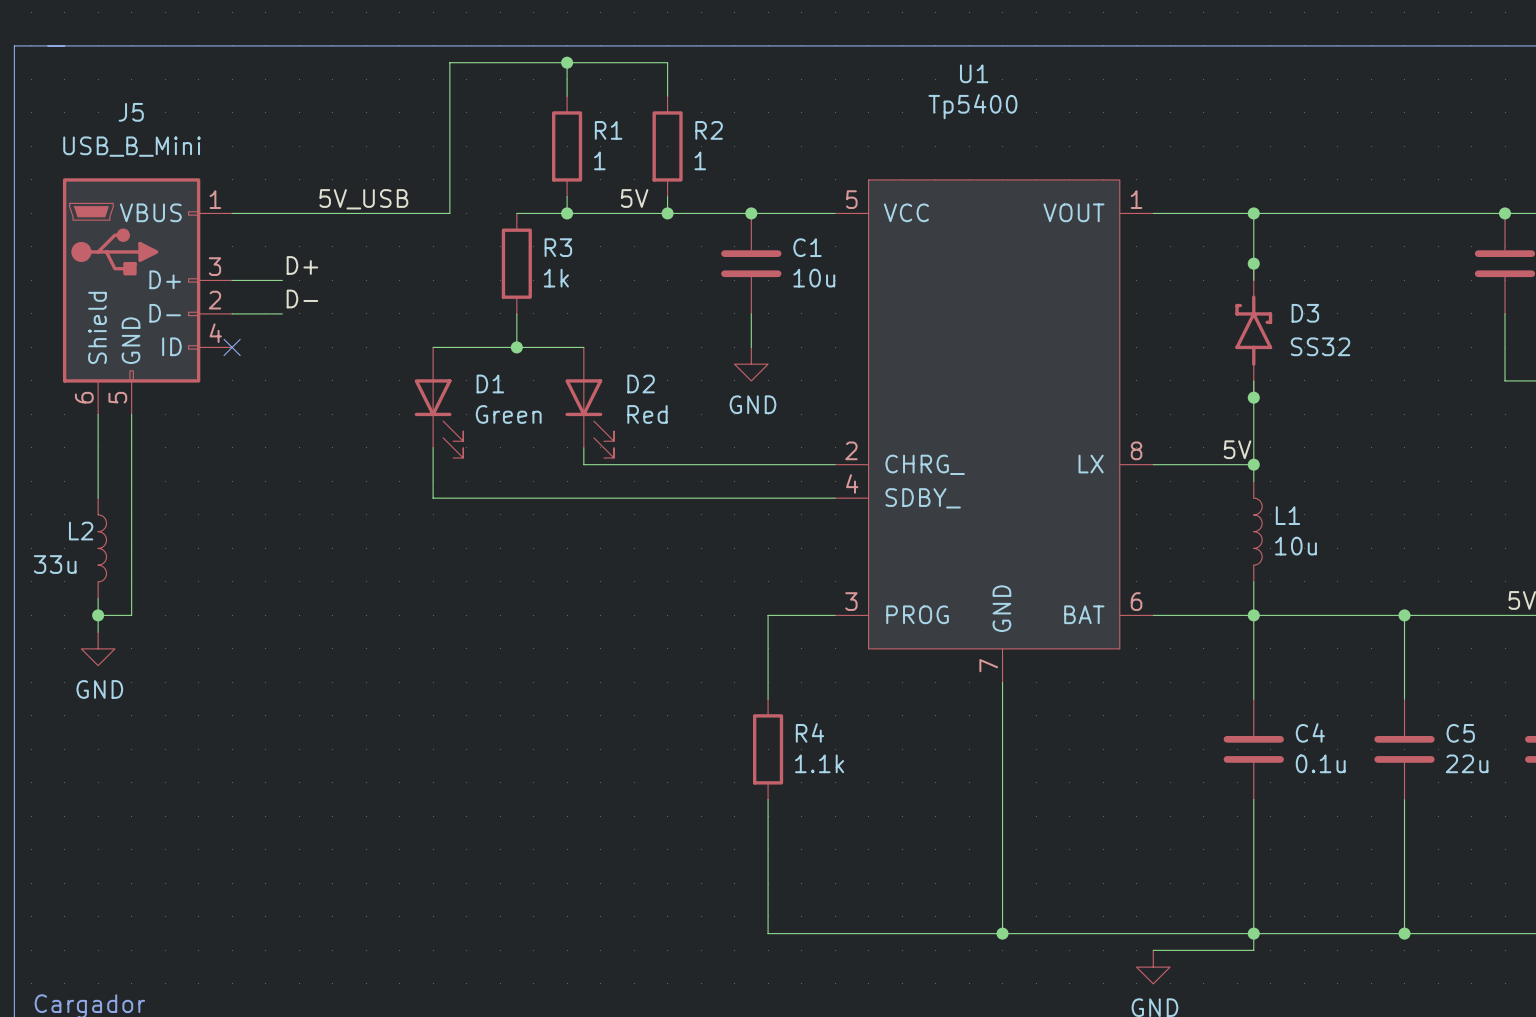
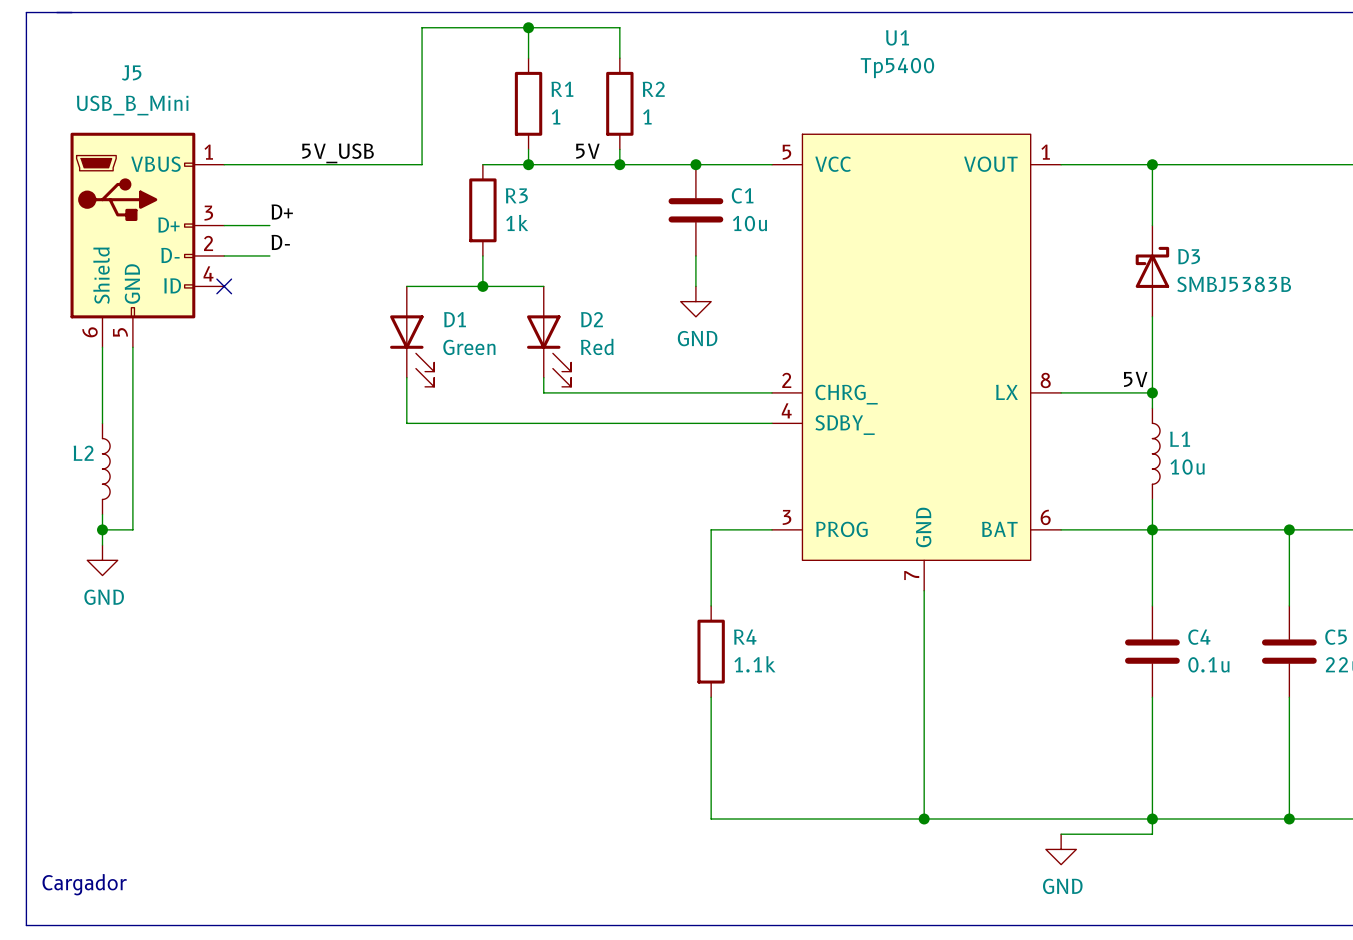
D3 symbol: [1235, 263, 1273, 398] -> [1135, 225, 1170, 317]
junction: (1253, 263) -> none
D3 value: SS32 (1320, 346) -> SMBJ5383B (1234, 284)
junction: (1253, 397) -> none
L2 value: 33u (55, 564) -> none

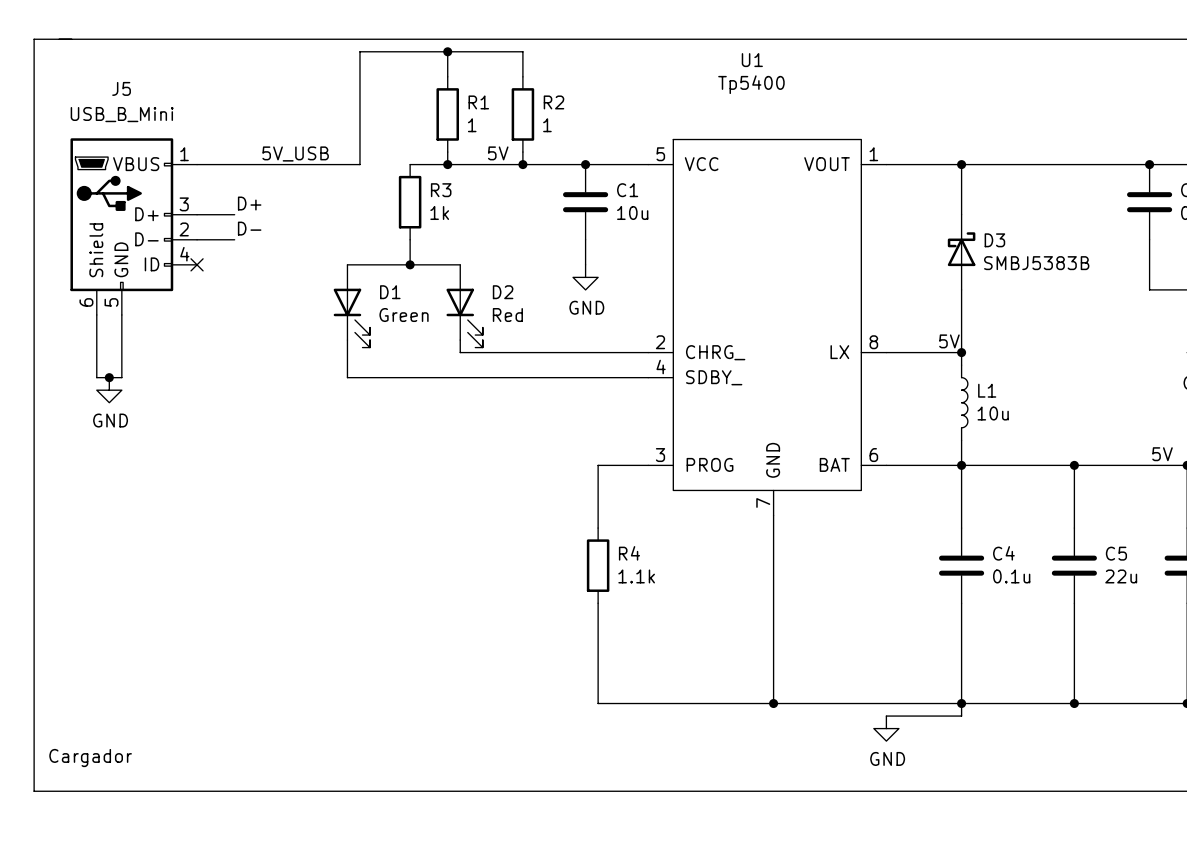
junction: none -> (109, 377)
wire: (132, 423) (132, 529) (102, 529) -> (121, 377) (96, 377)
L2: (106, 469) -> none
wire: (102, 514) (102, 545) -> none
junction: (102, 529) -> none
power symbol position: GND (102, 560) -> GND (109, 390)

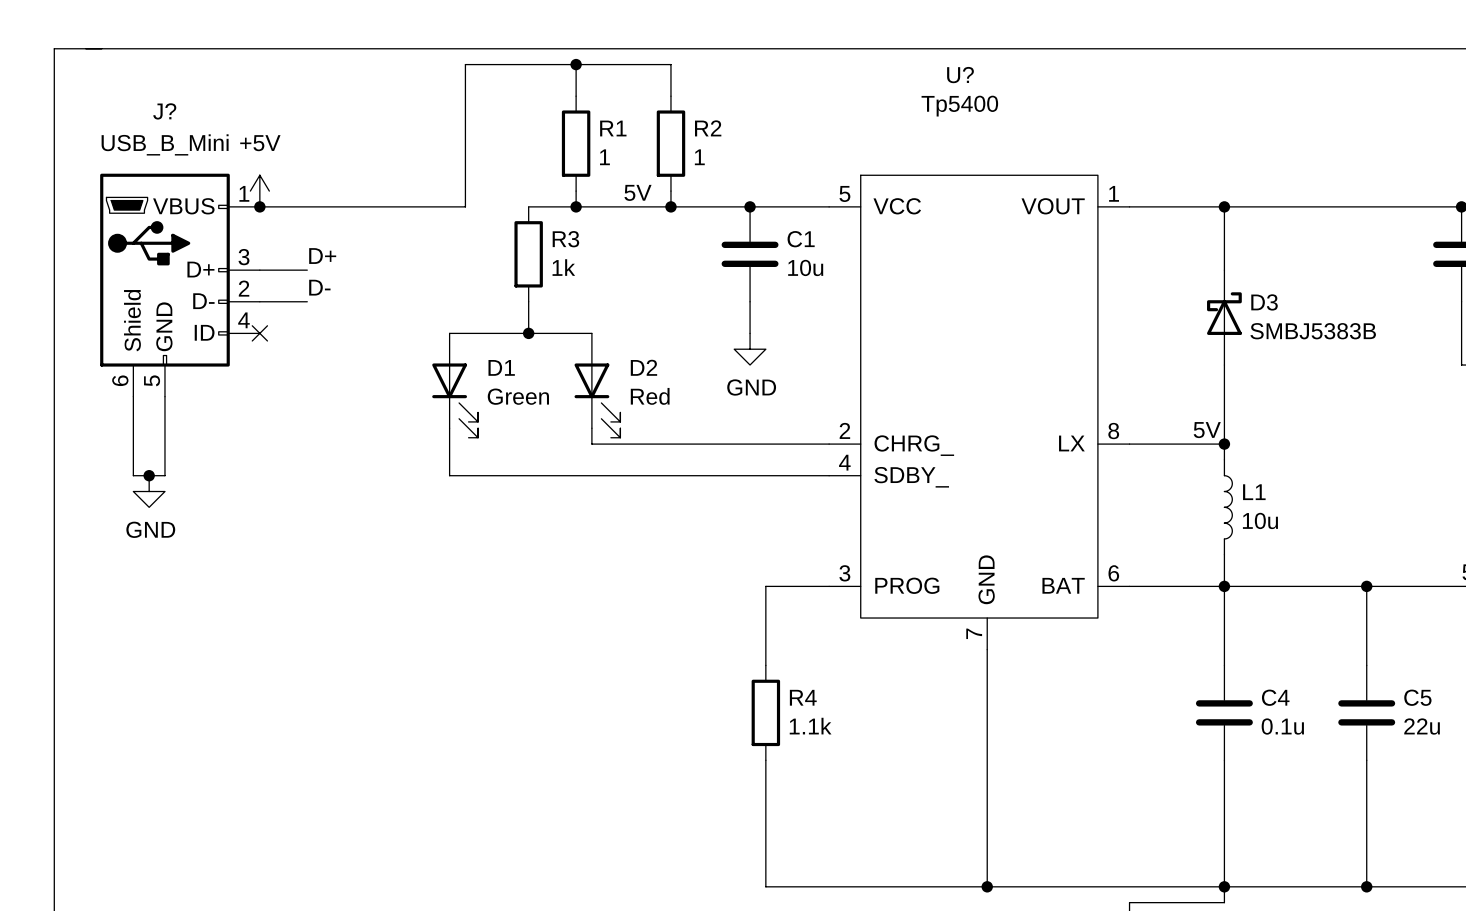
U1 name: U1 (752, 60) -> U? (960, 75)
J5 name: J5 (121, 88) -> J? (164, 111)
power symbol: none -> +5V (259, 191)
label: 5V_USB (295, 153) -> none
junction: none -> (259, 206)

